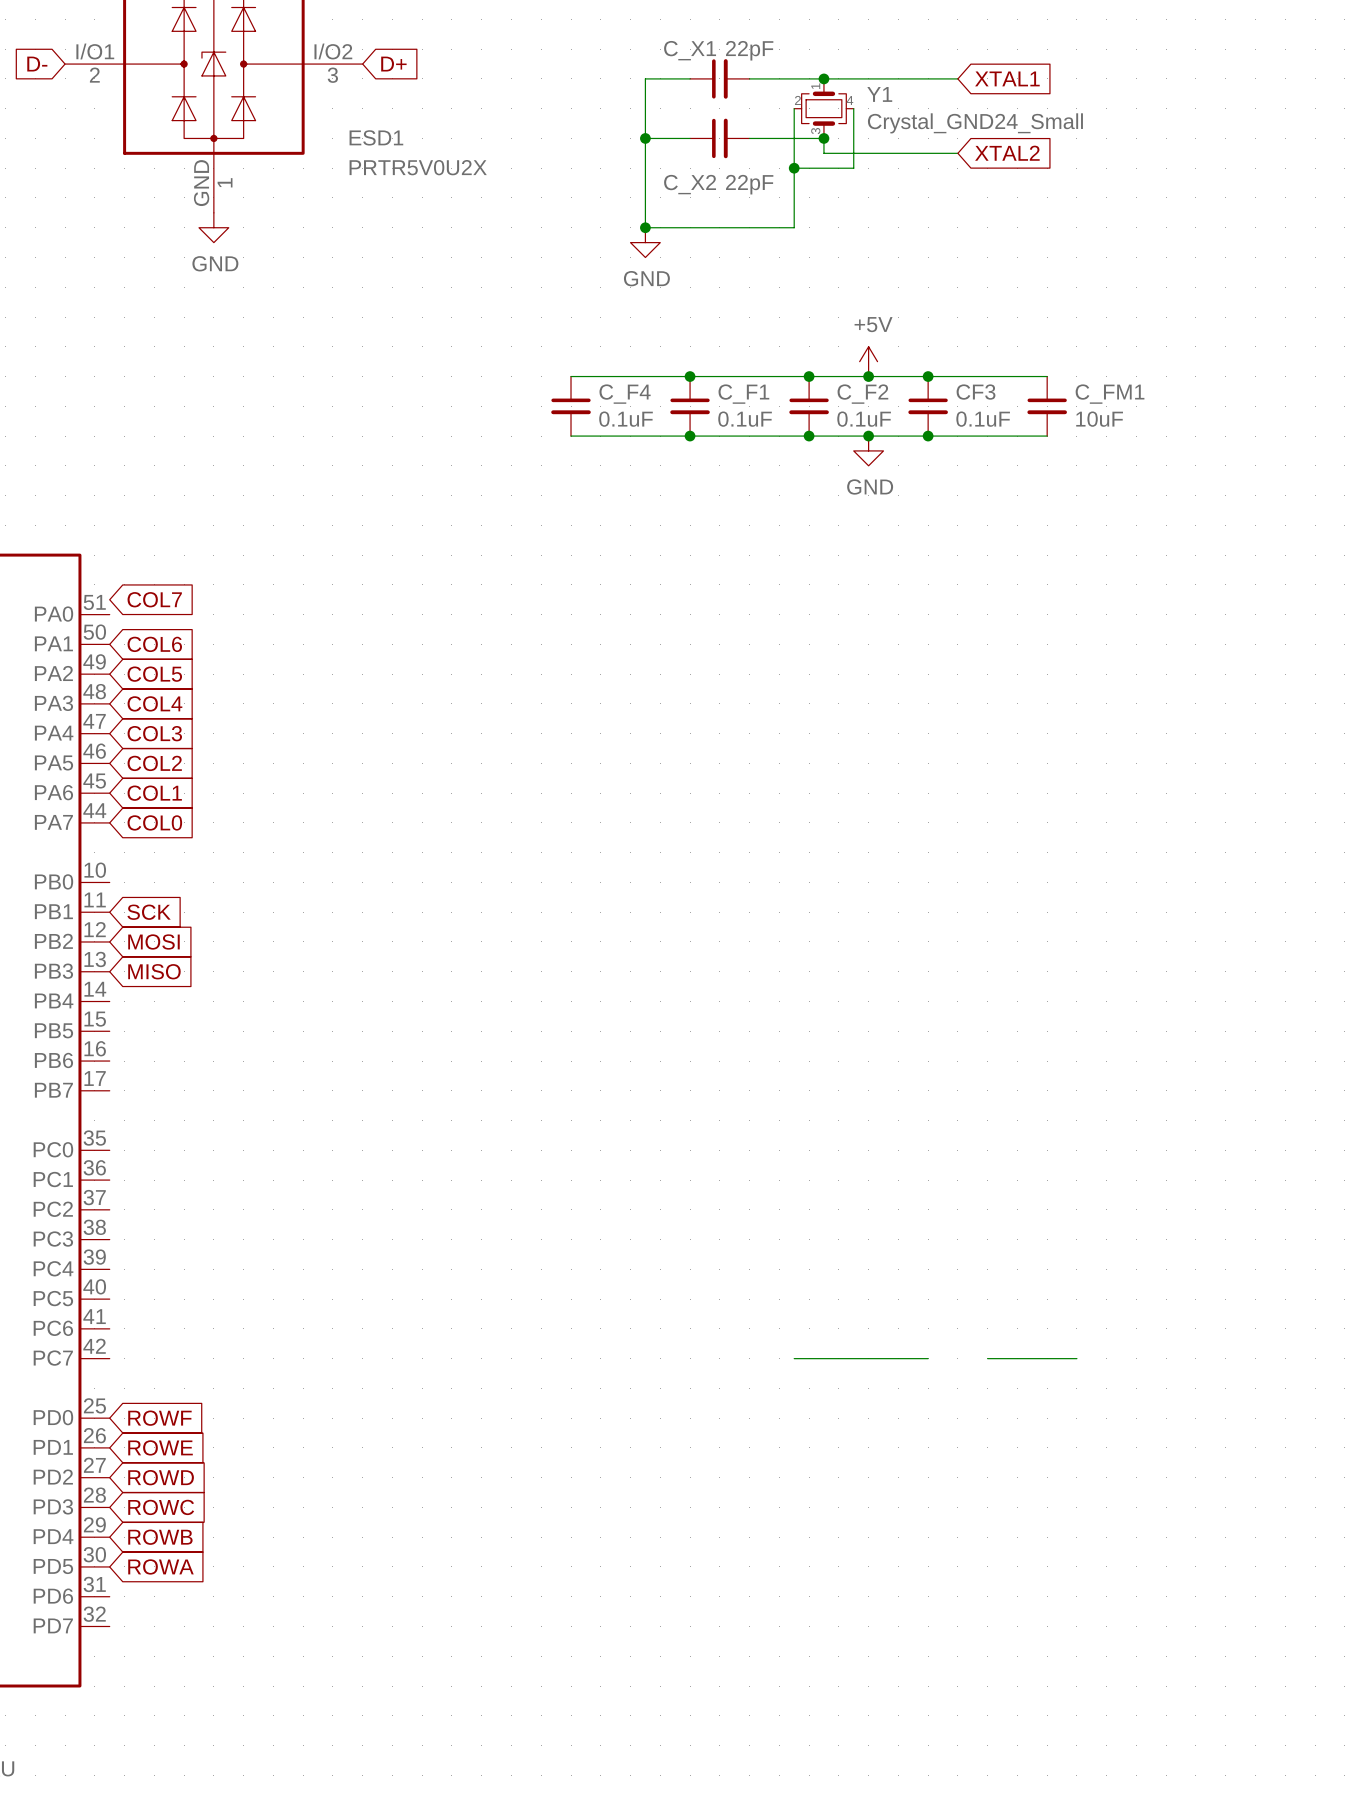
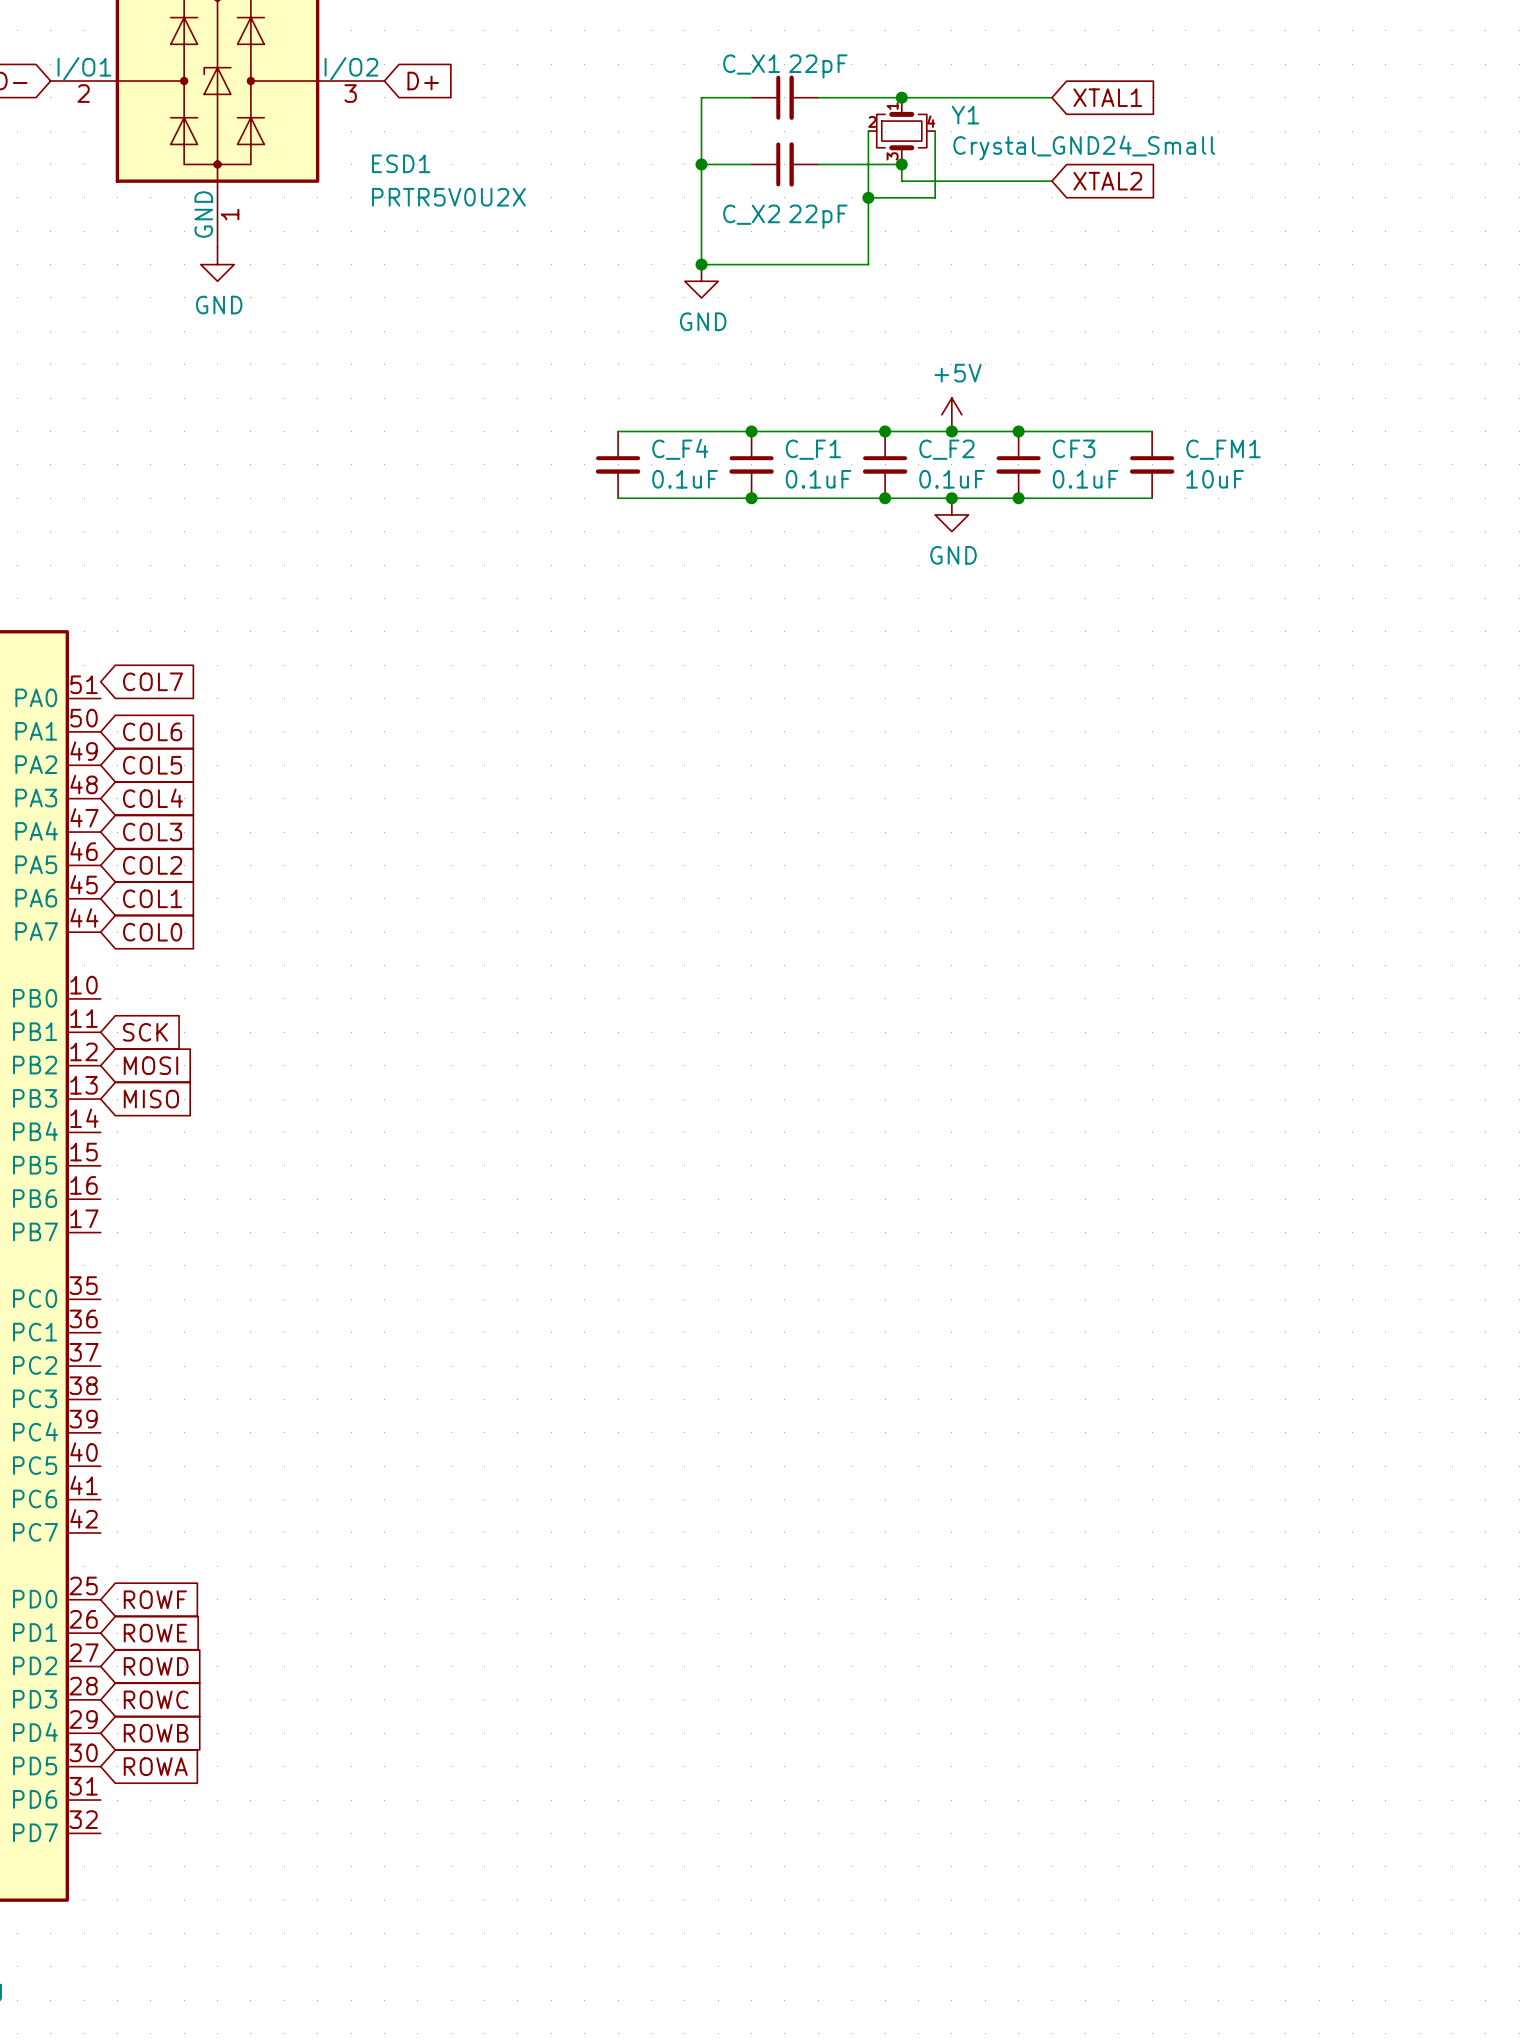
wire: (794, 1358) (928, 1358) -> none
wire: (987, 1358) (1076, 1358) -> none

